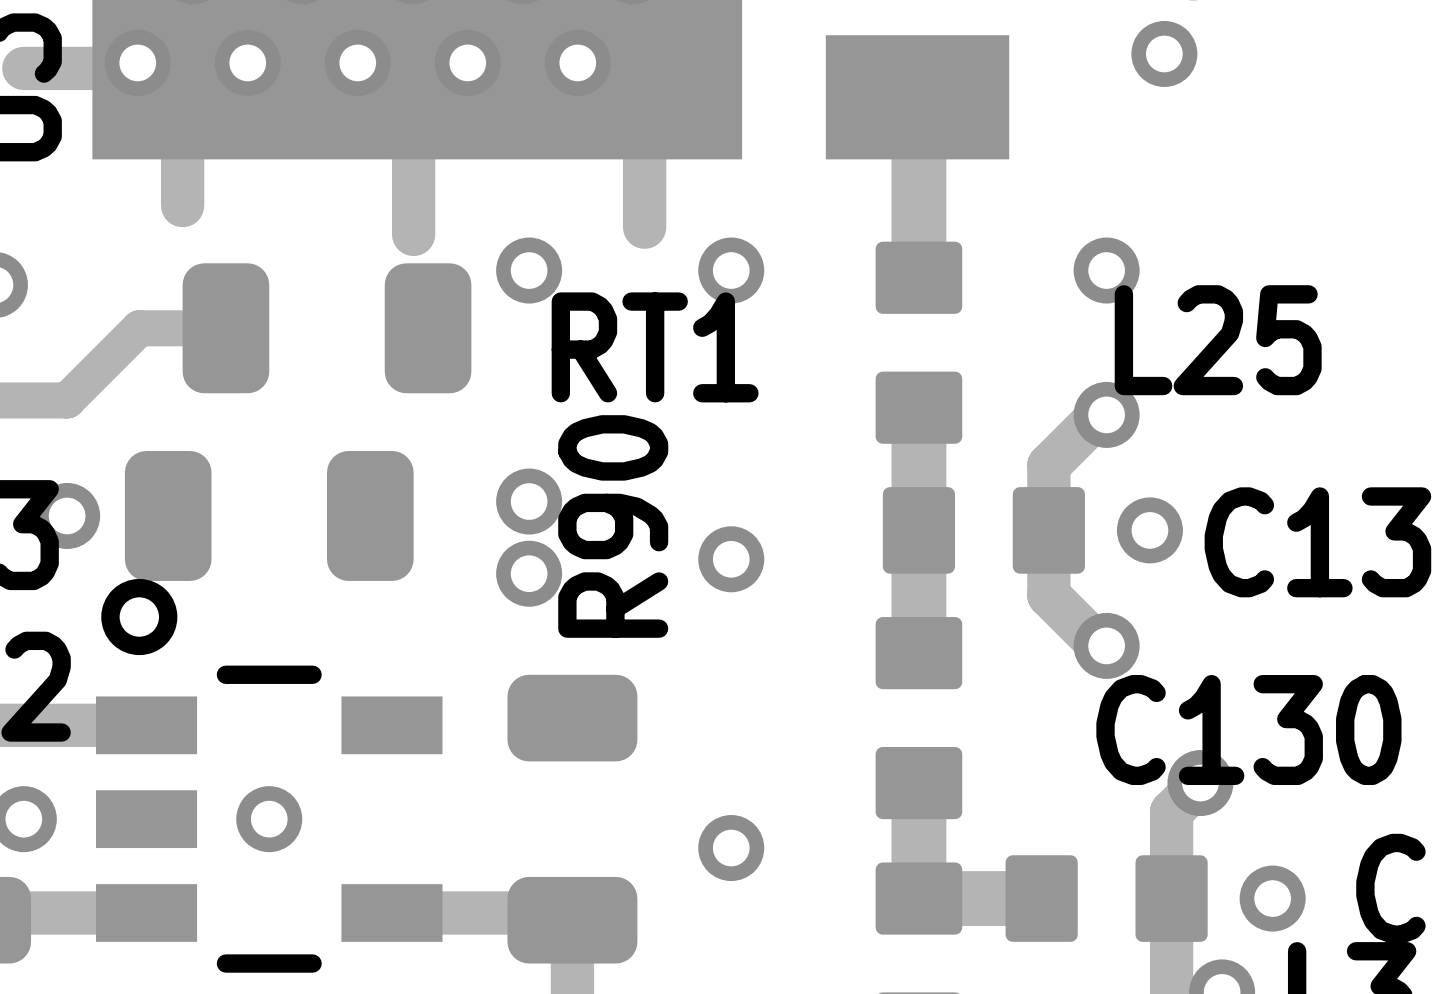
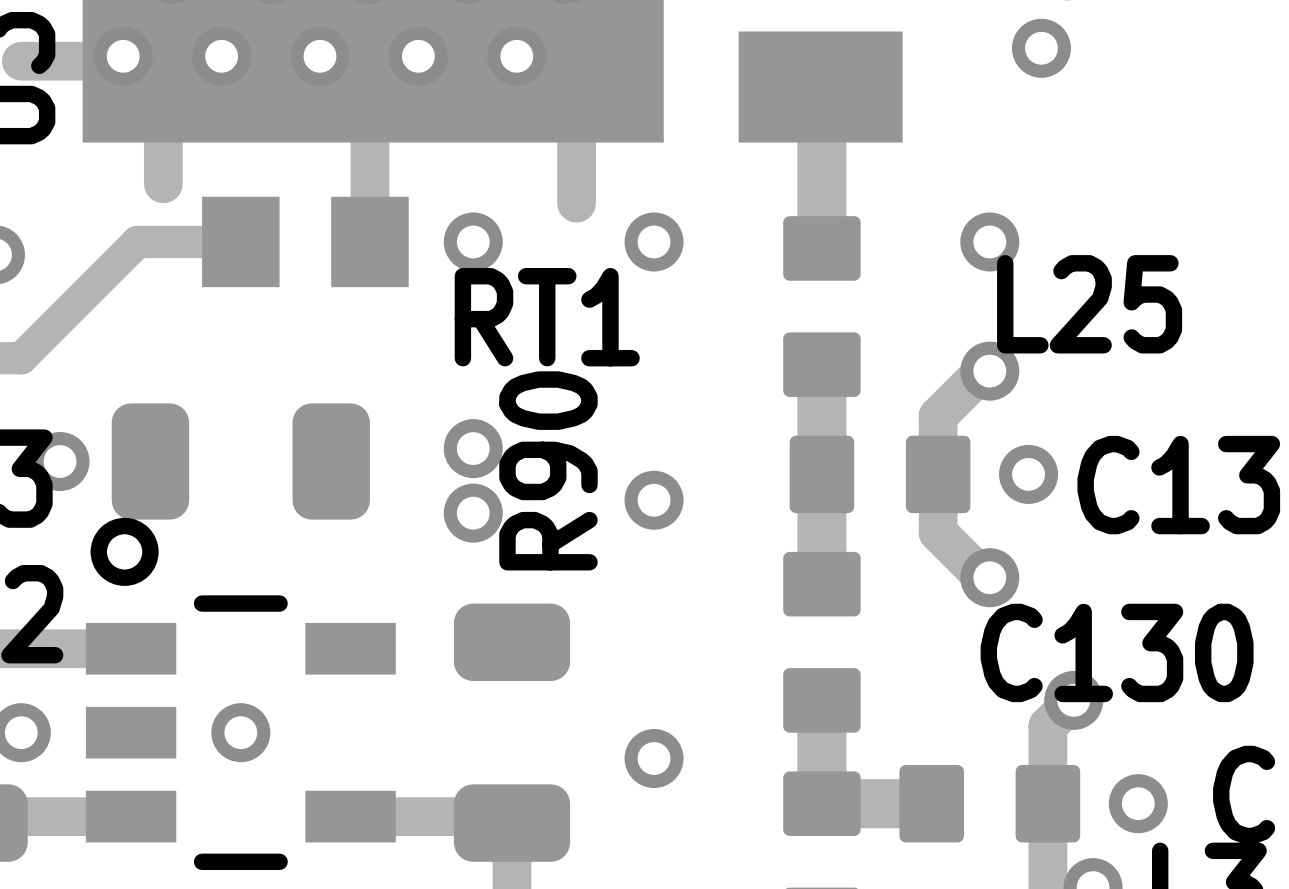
RT1 footprint: [182, 263, 472, 394] -> [202, 196, 409, 288]
track: (225, 328) (139, 328) (67, 400) (23, 400) -> (240, 241) (137, 241) (21, 358)
RT1 name position: RT1 (655, 347) -> RT1 (547, 317)

